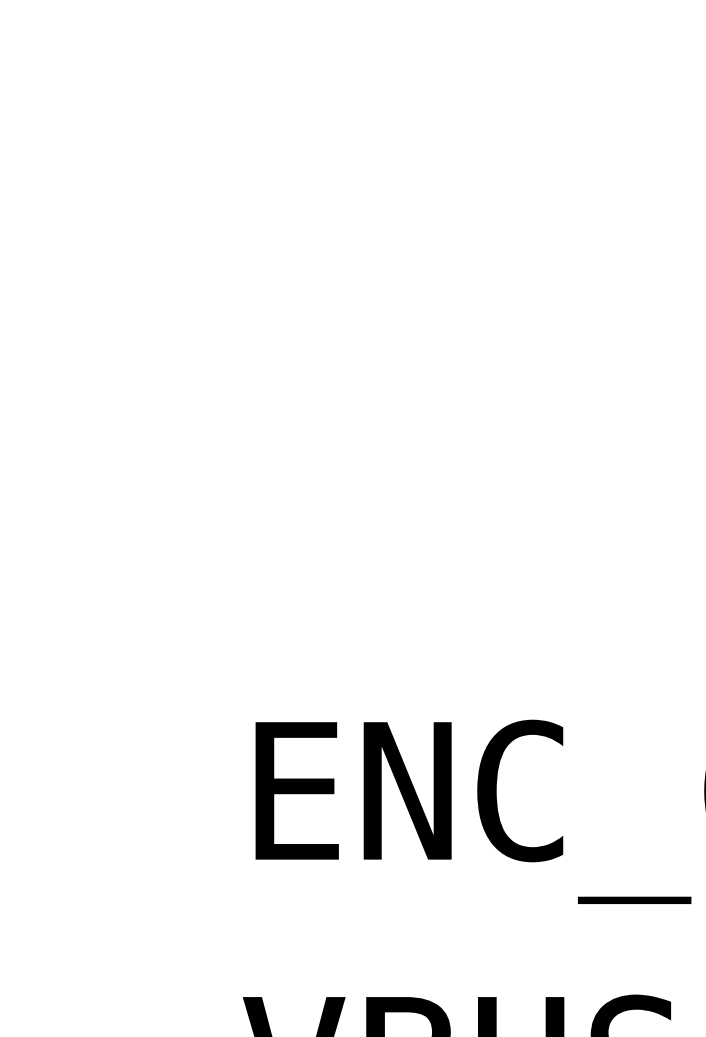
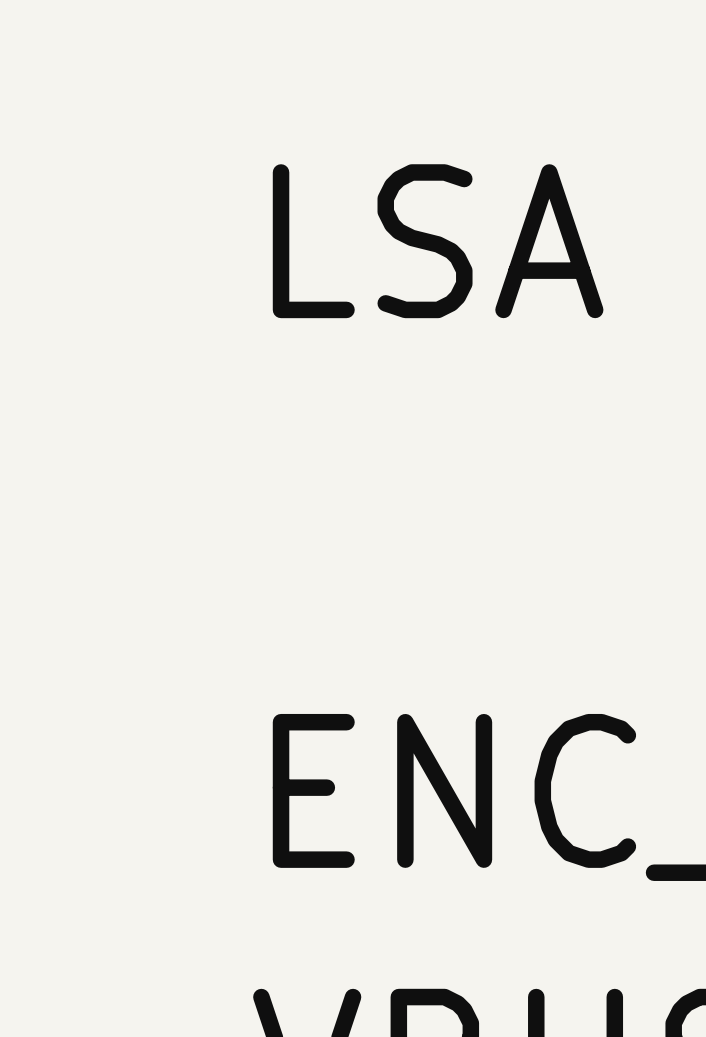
label: none -> LSA (438, 241)

